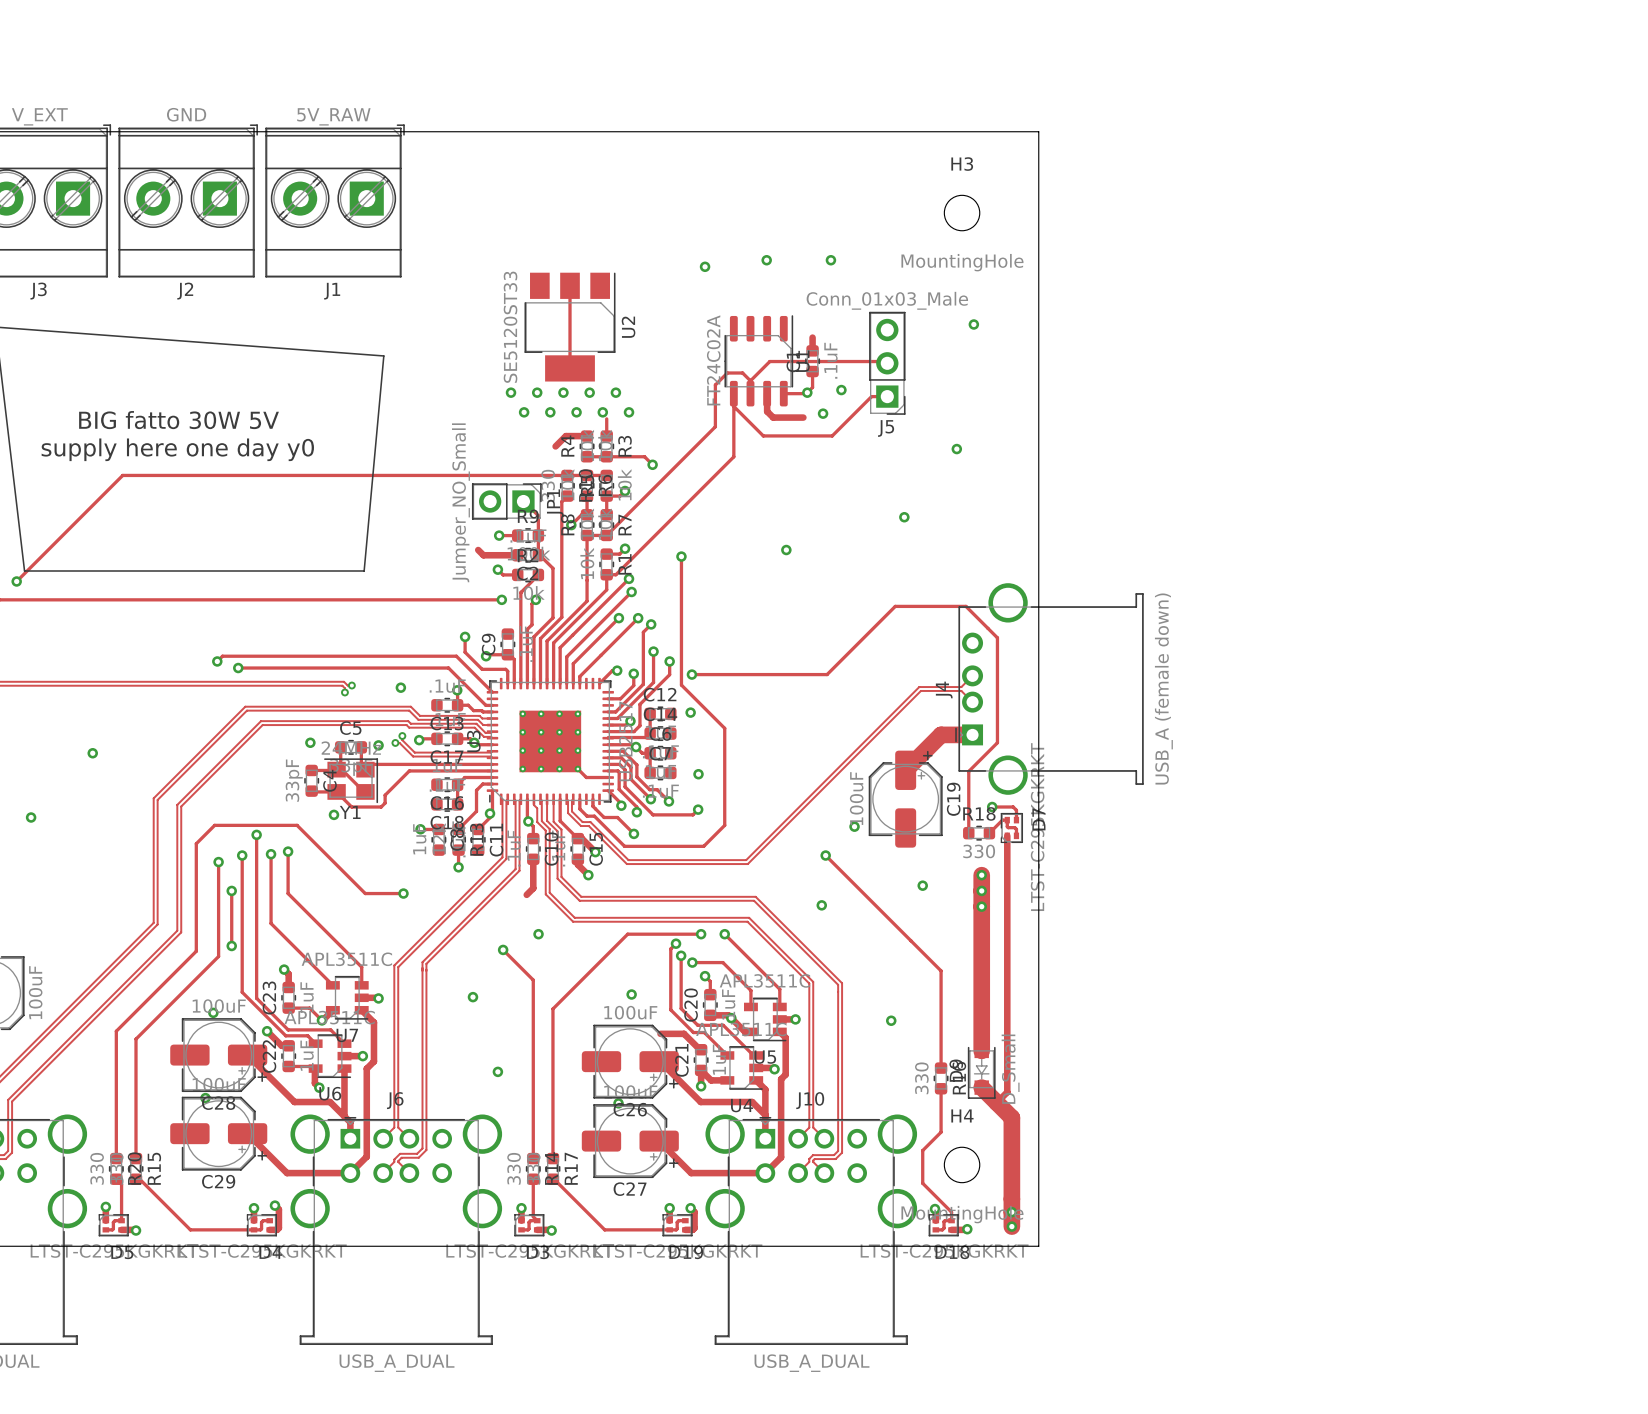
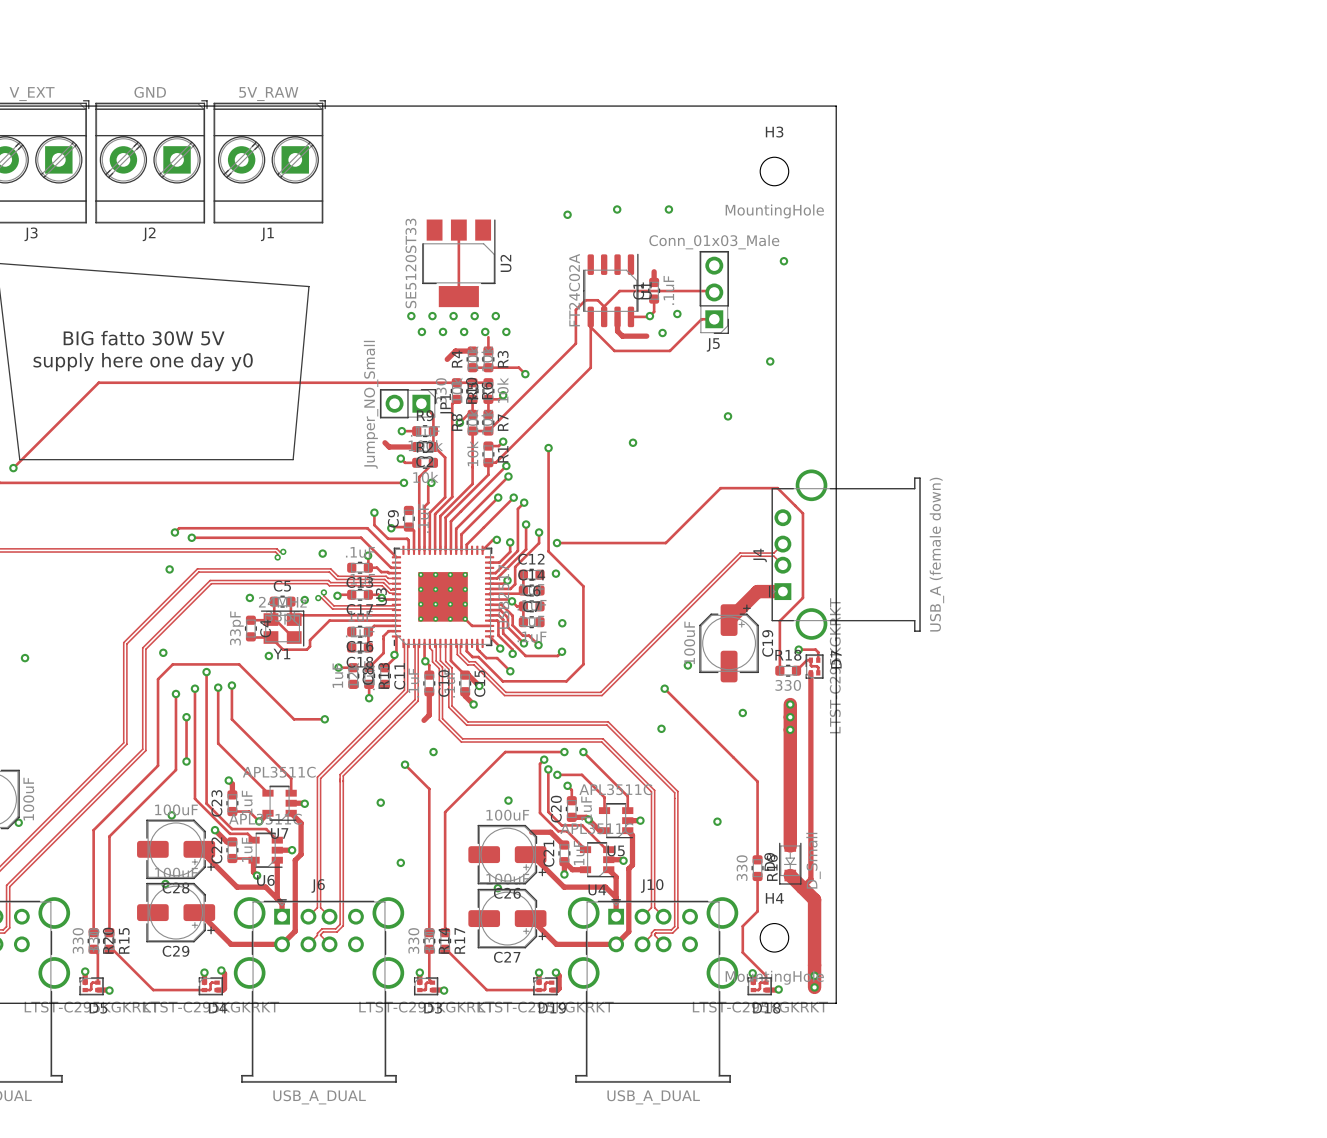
via: none -> (169, 569)
via: (92, 753) -> none
via: none -> (163, 652)
via: none -> (18, 822)

